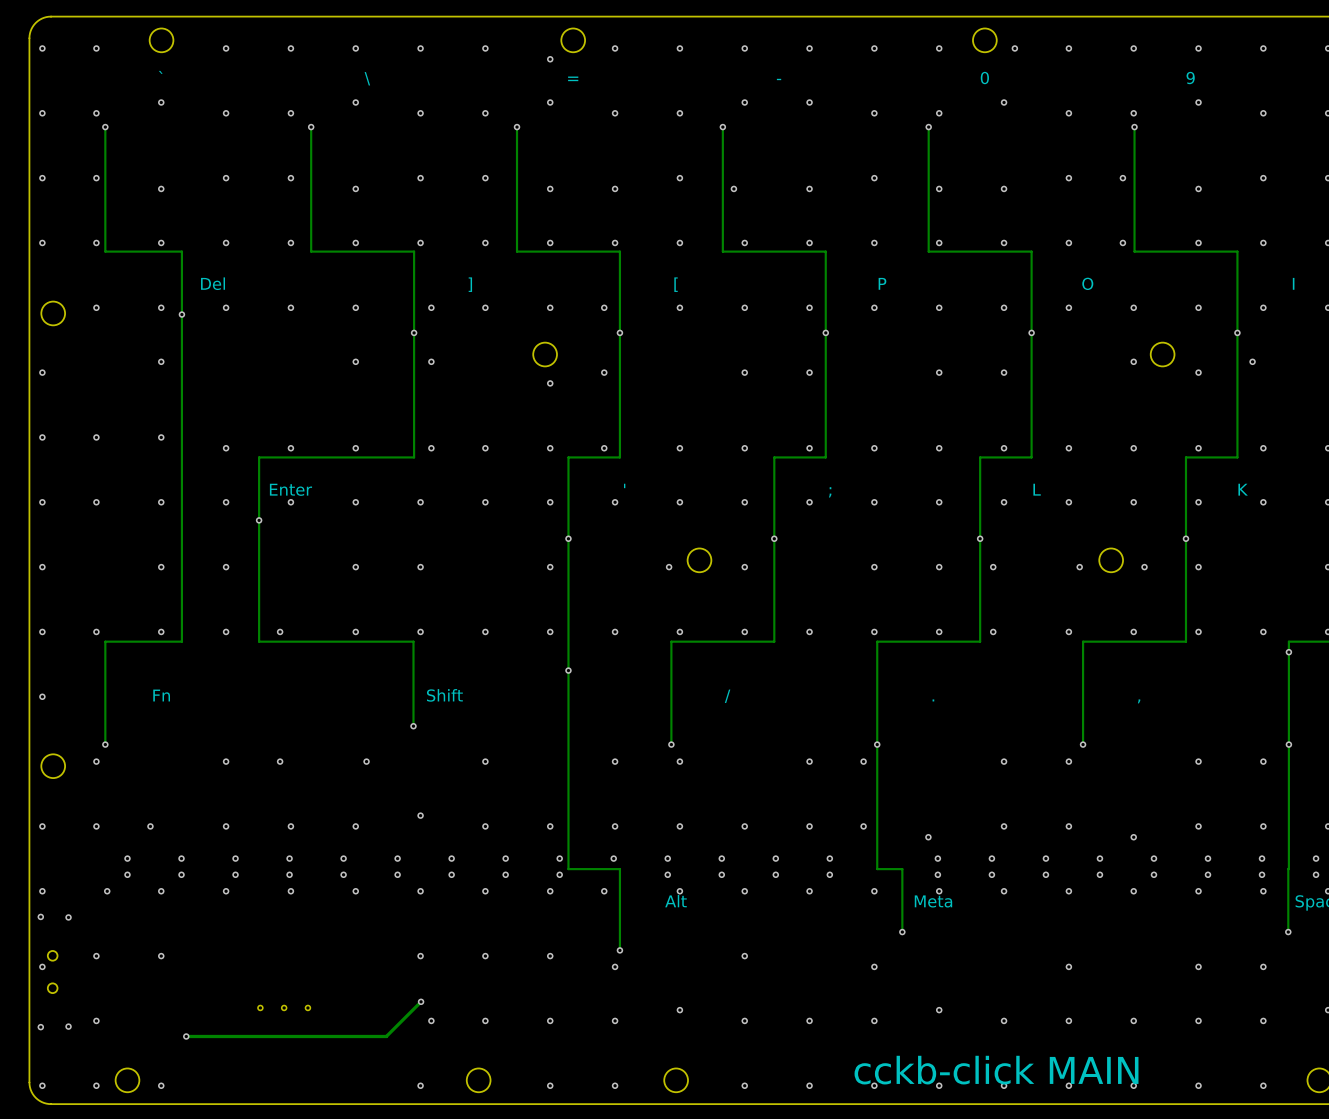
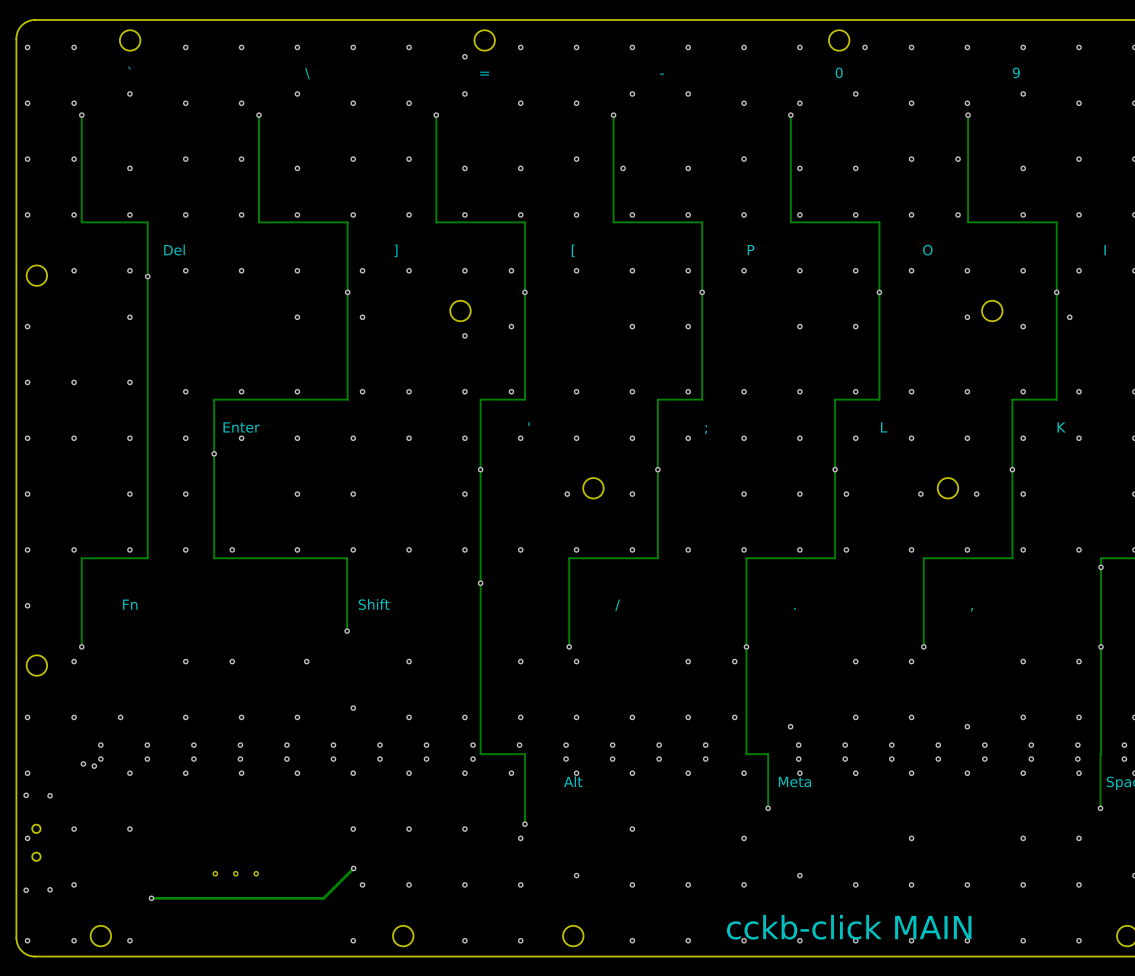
via: none -> (83, 763)
via: none -> (94, 766)
via: (107, 891) -> none

